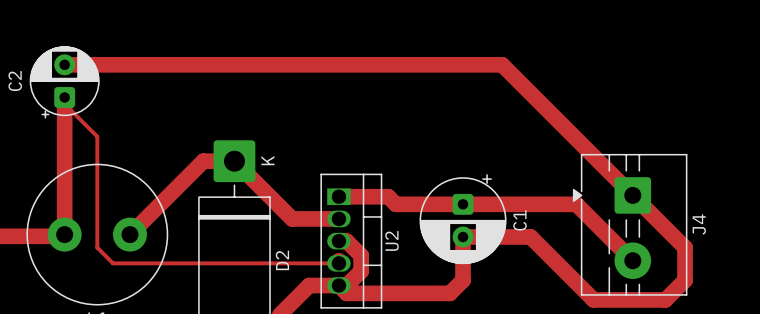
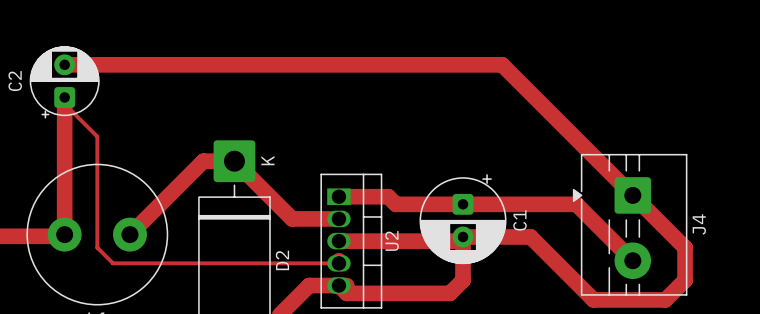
track: (346, 241) (361, 255) (361, 271) (346, 285) -> (346, 241) (458, 241) (463, 236)

